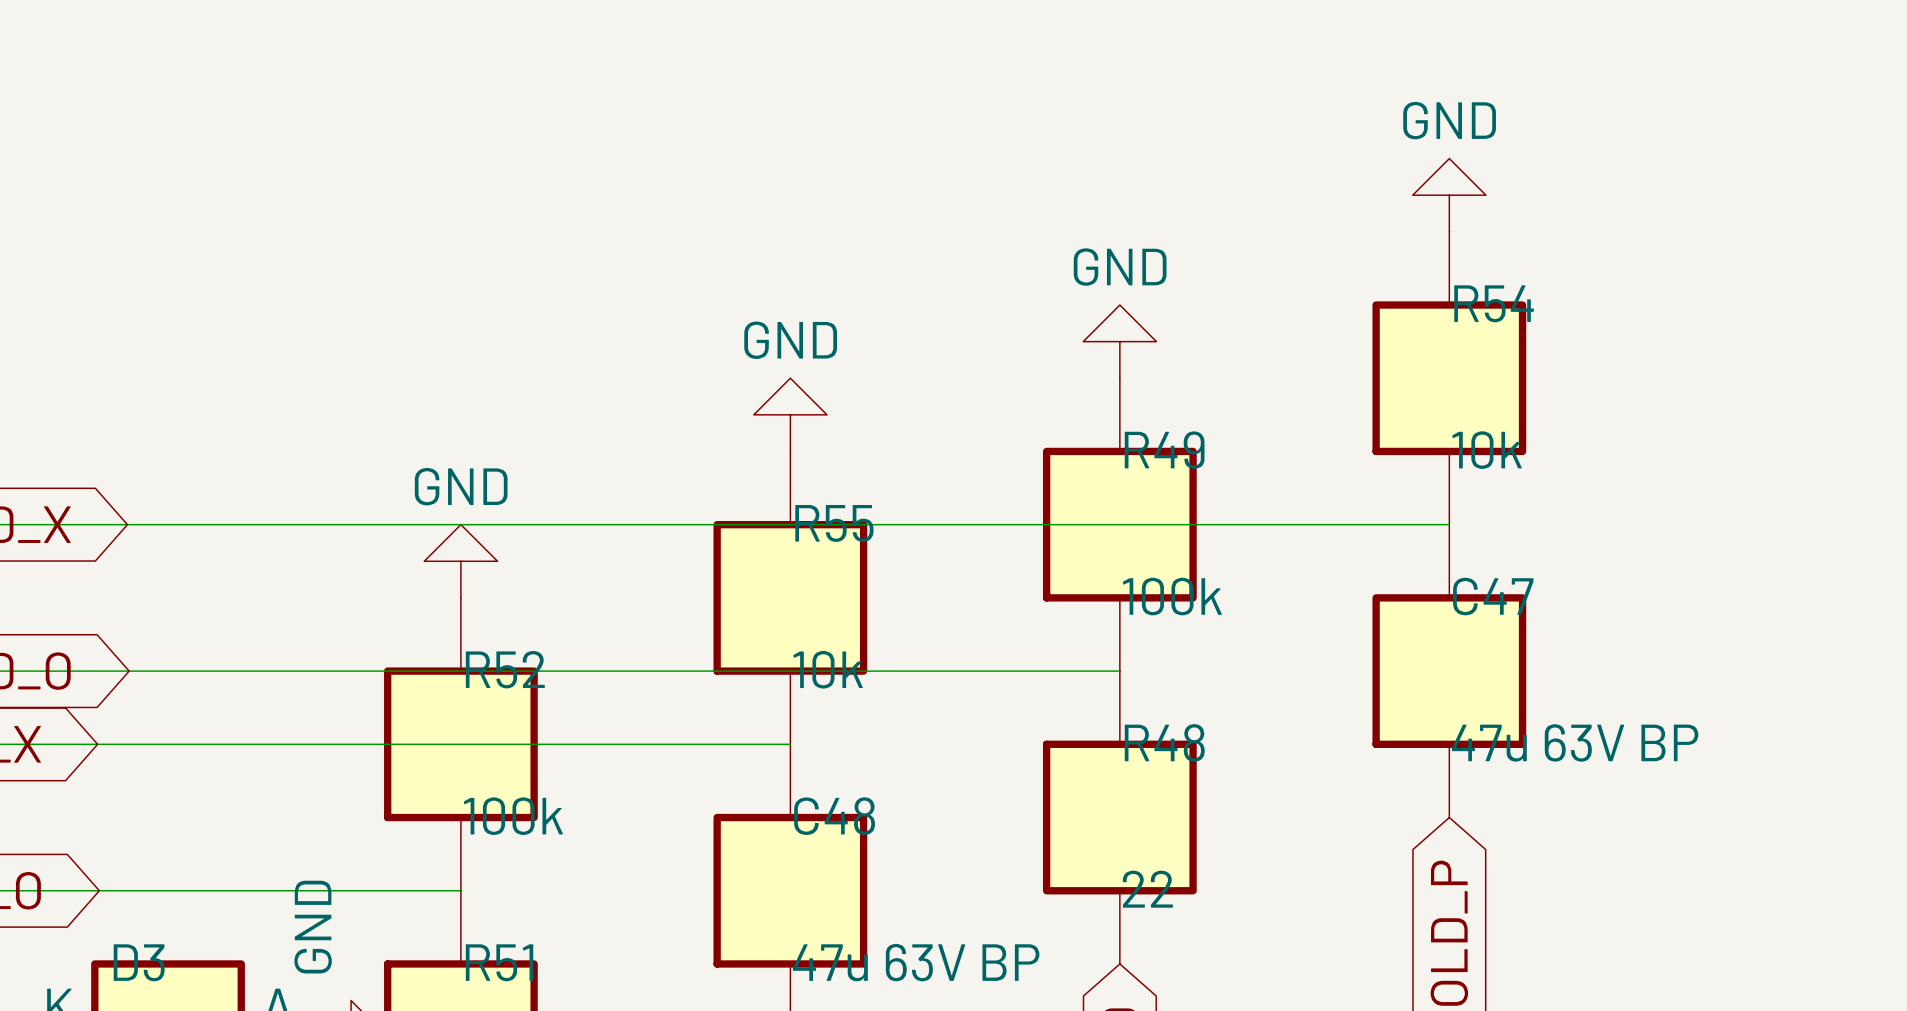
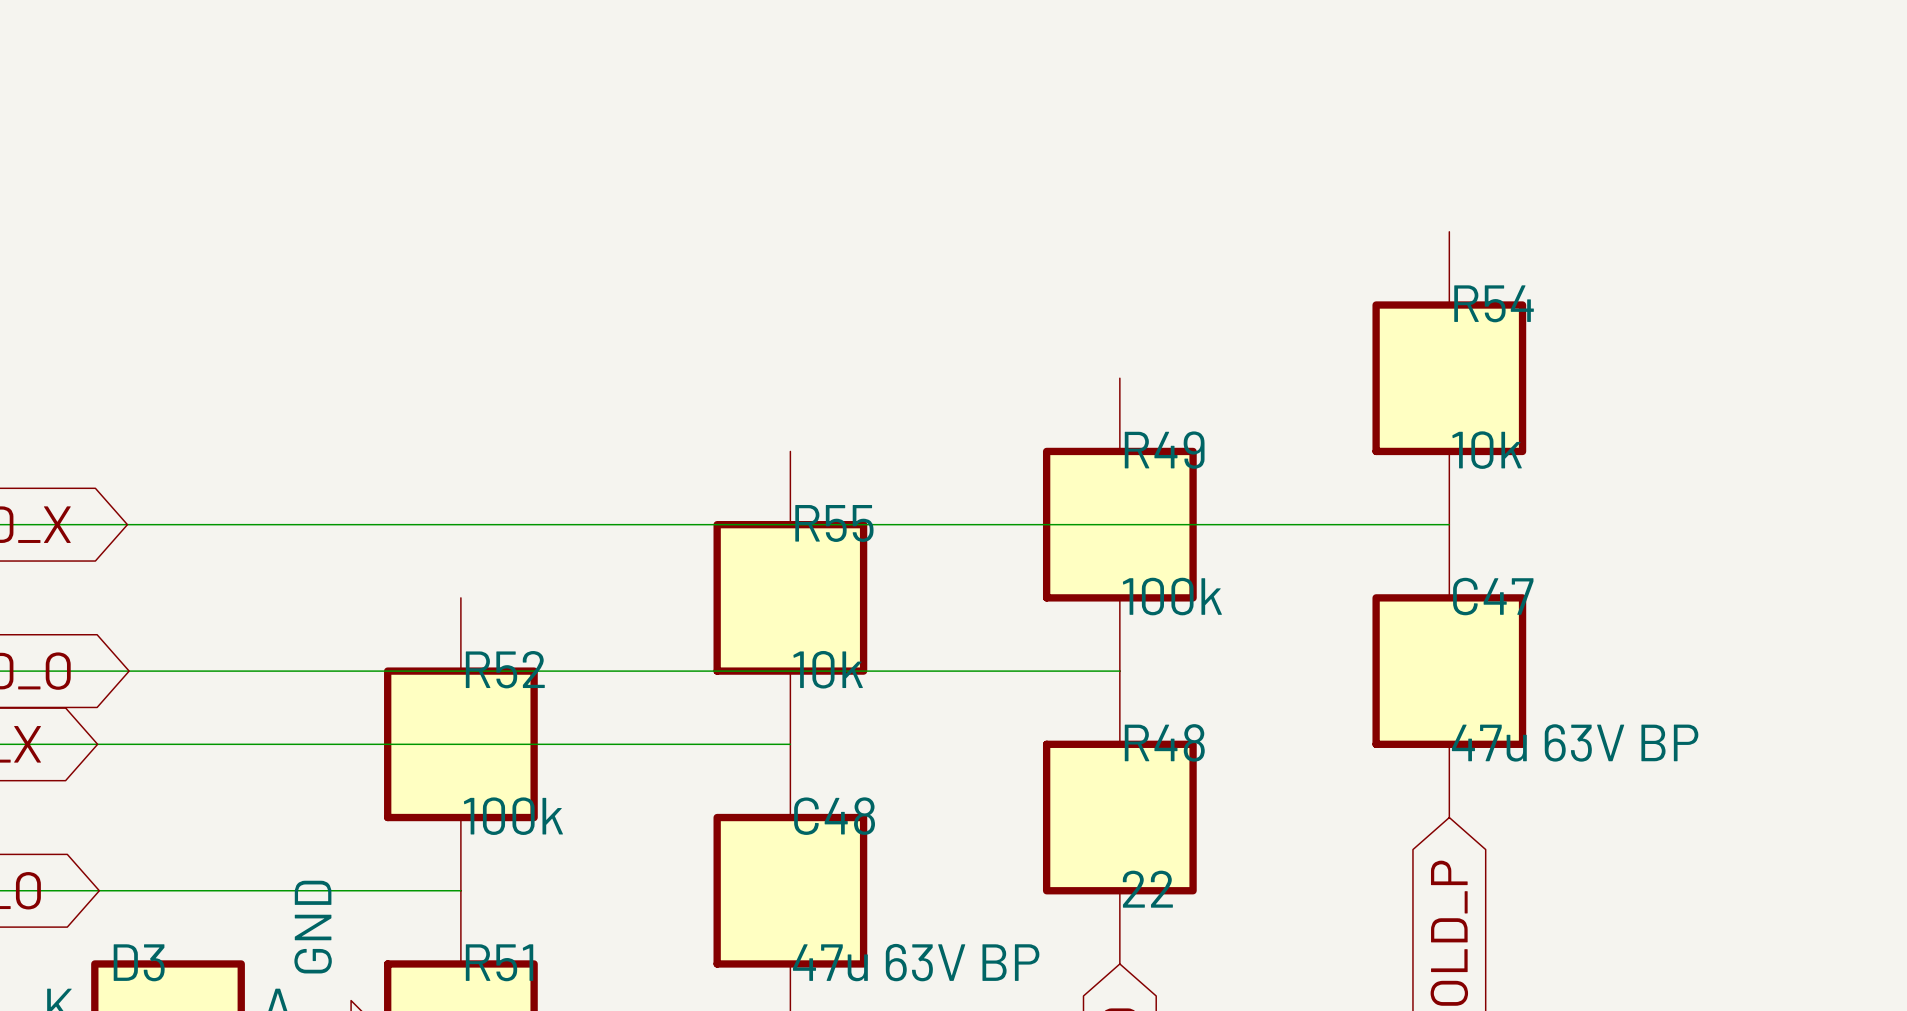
power symbol: GND (1449, 195) -> none
power symbol: GND (1119, 341) -> none
power symbol: GND (790, 414) -> none
power symbol: GND (460, 561) -> none

